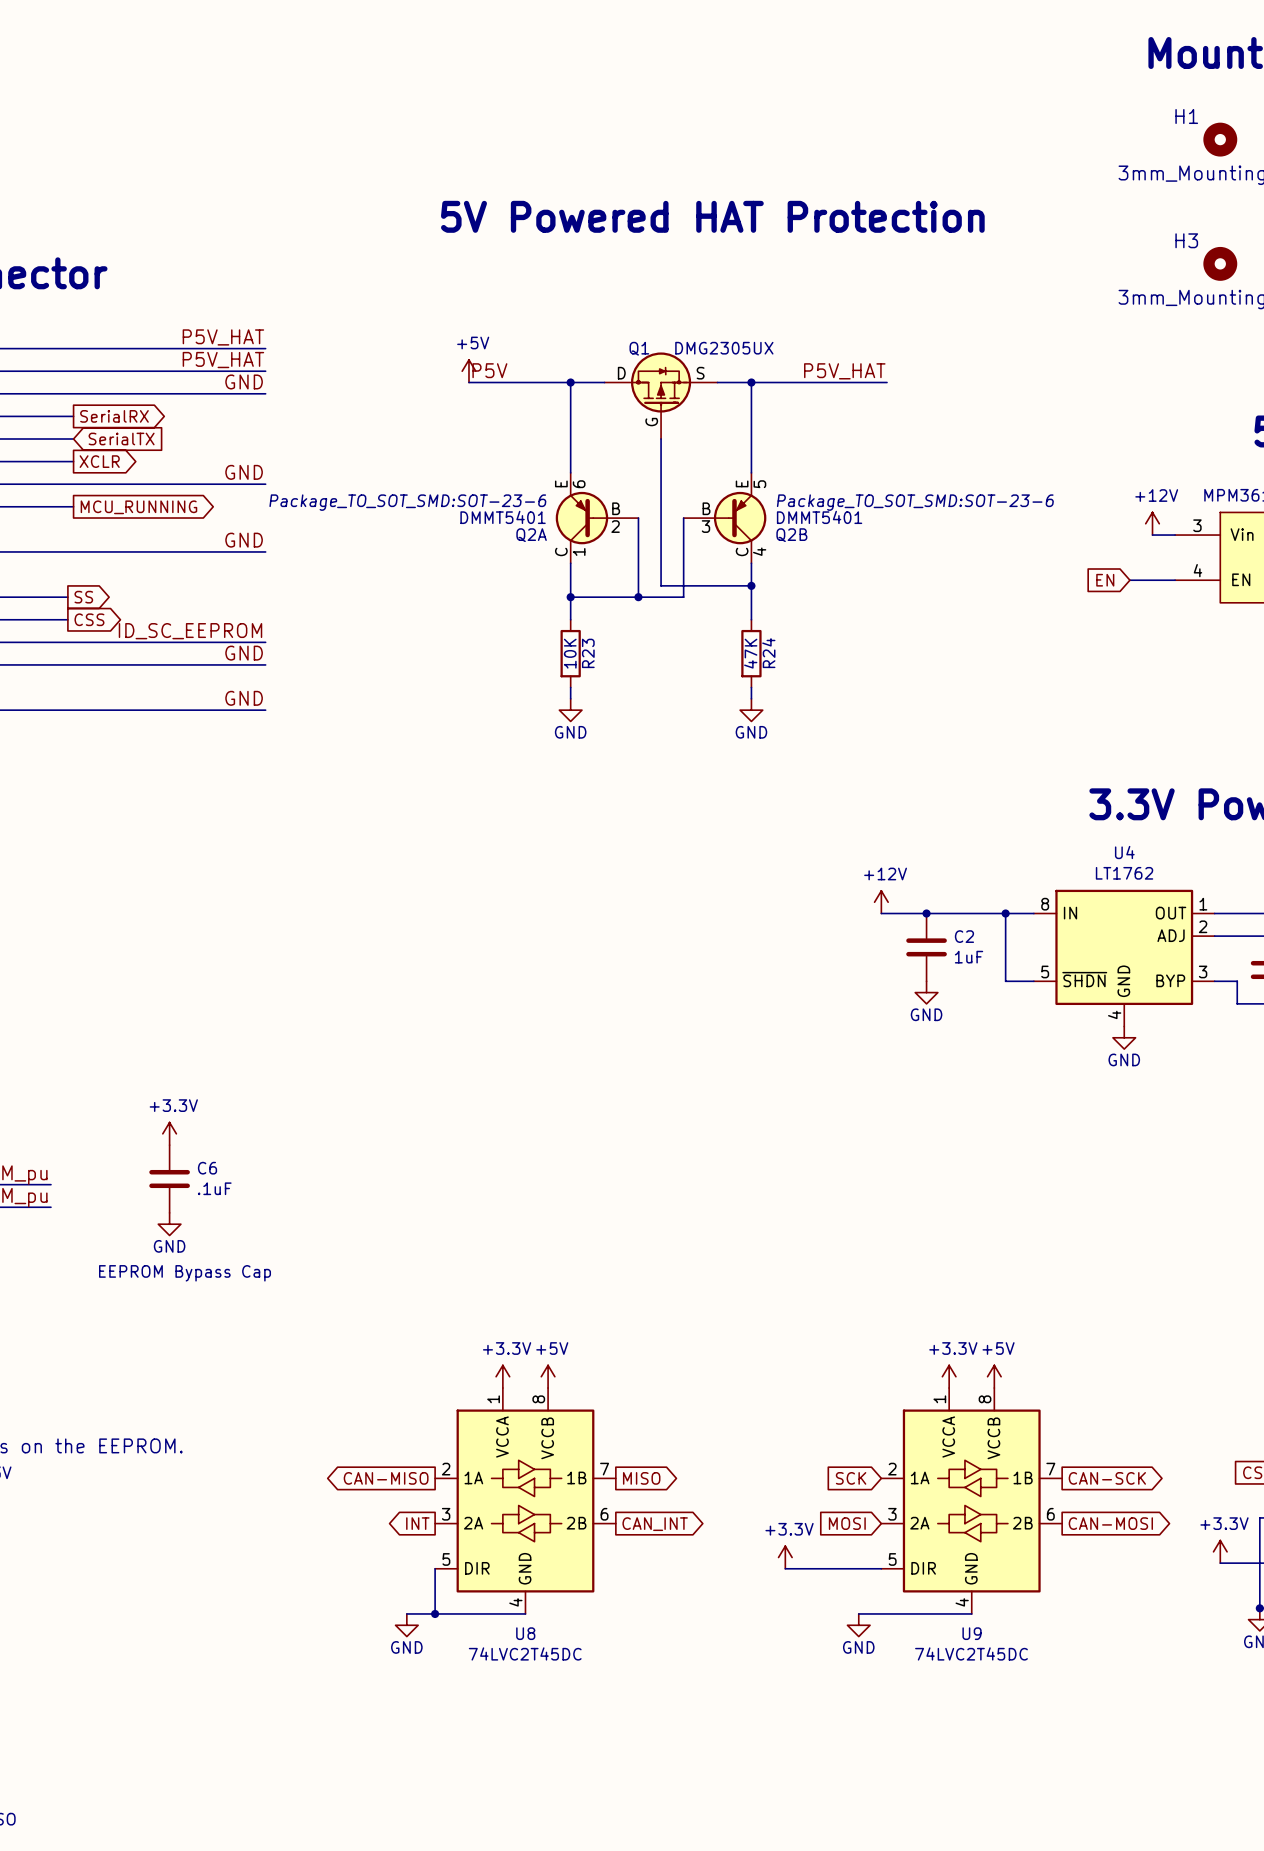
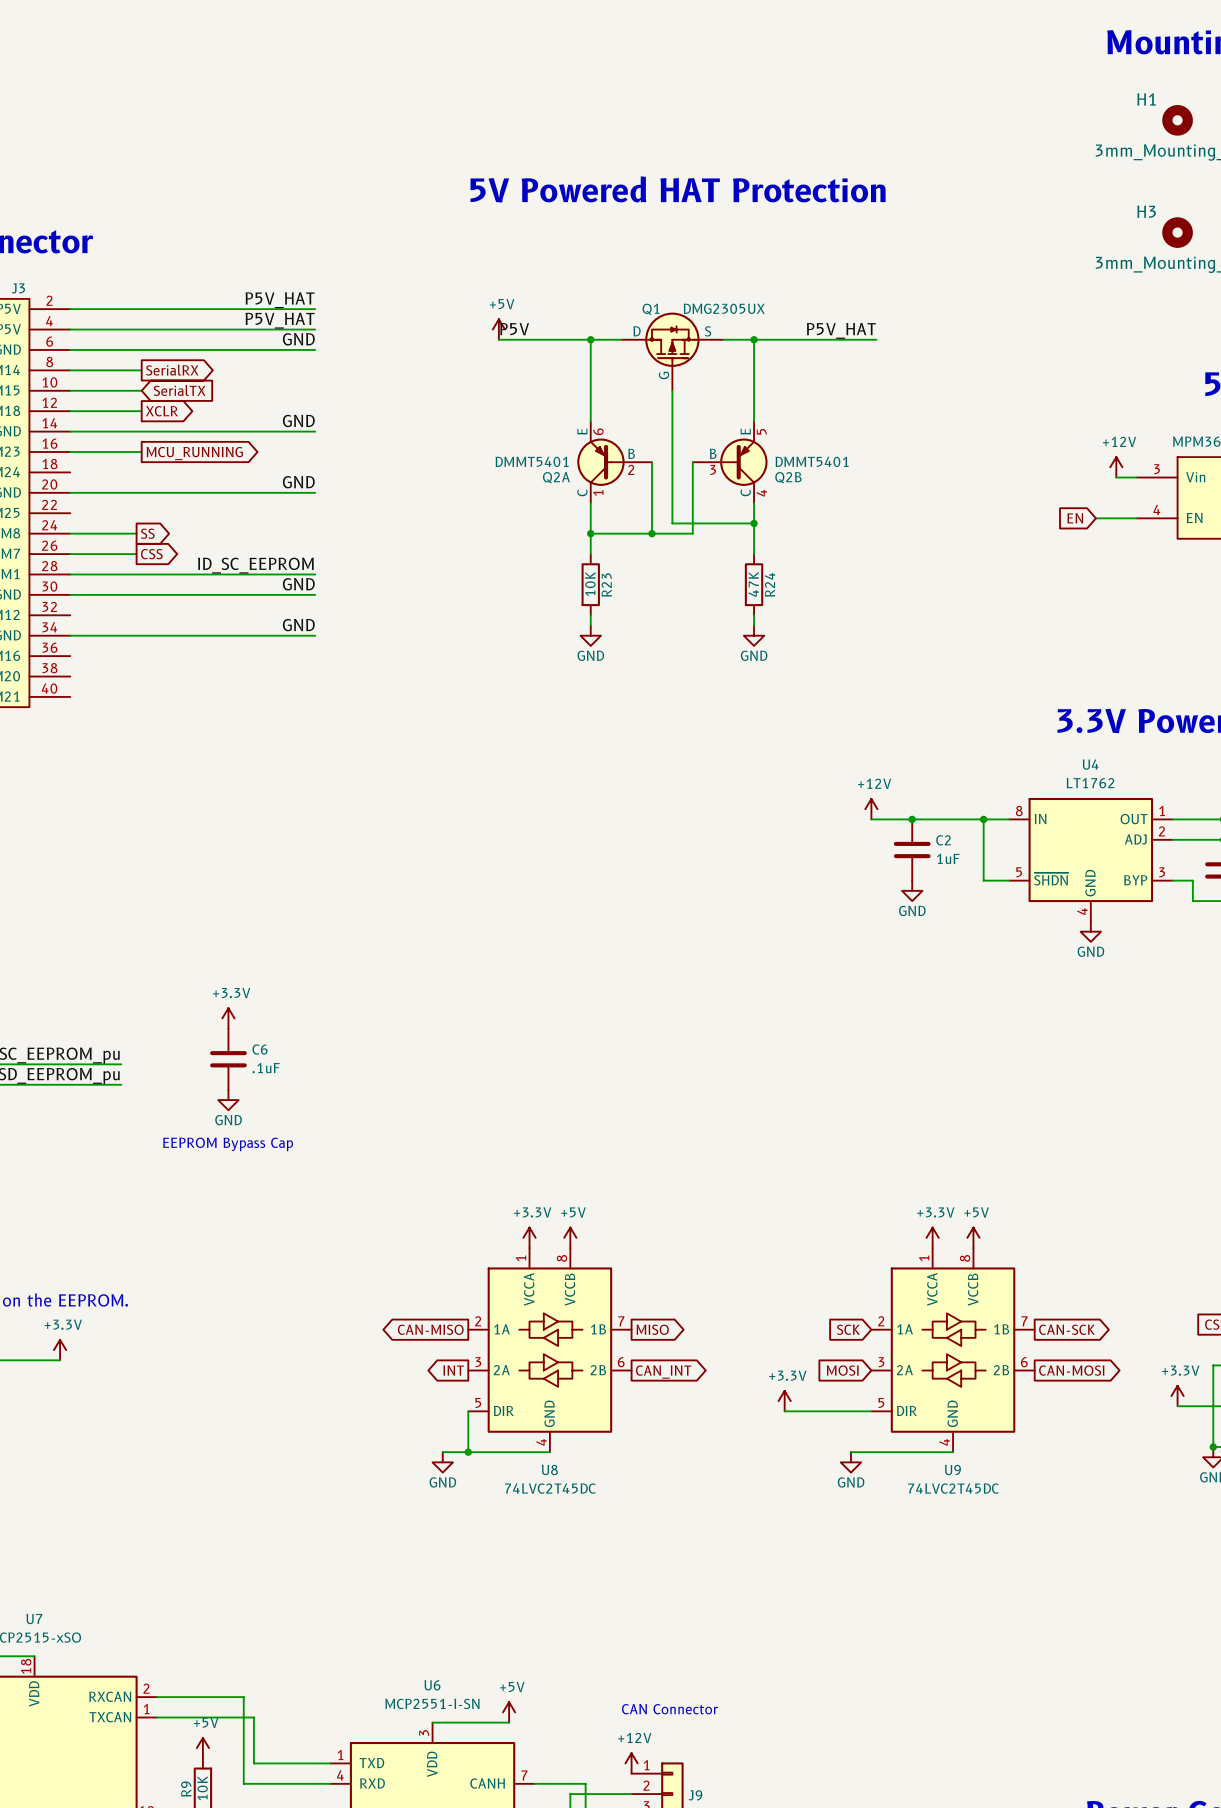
Q2A text: Package_TO_SOT_SMD:SOT-23-6 (407, 502) -> none
Q2B text: Package_TO_SOT_SMD:SOT-23-6 (915, 502) -> none

